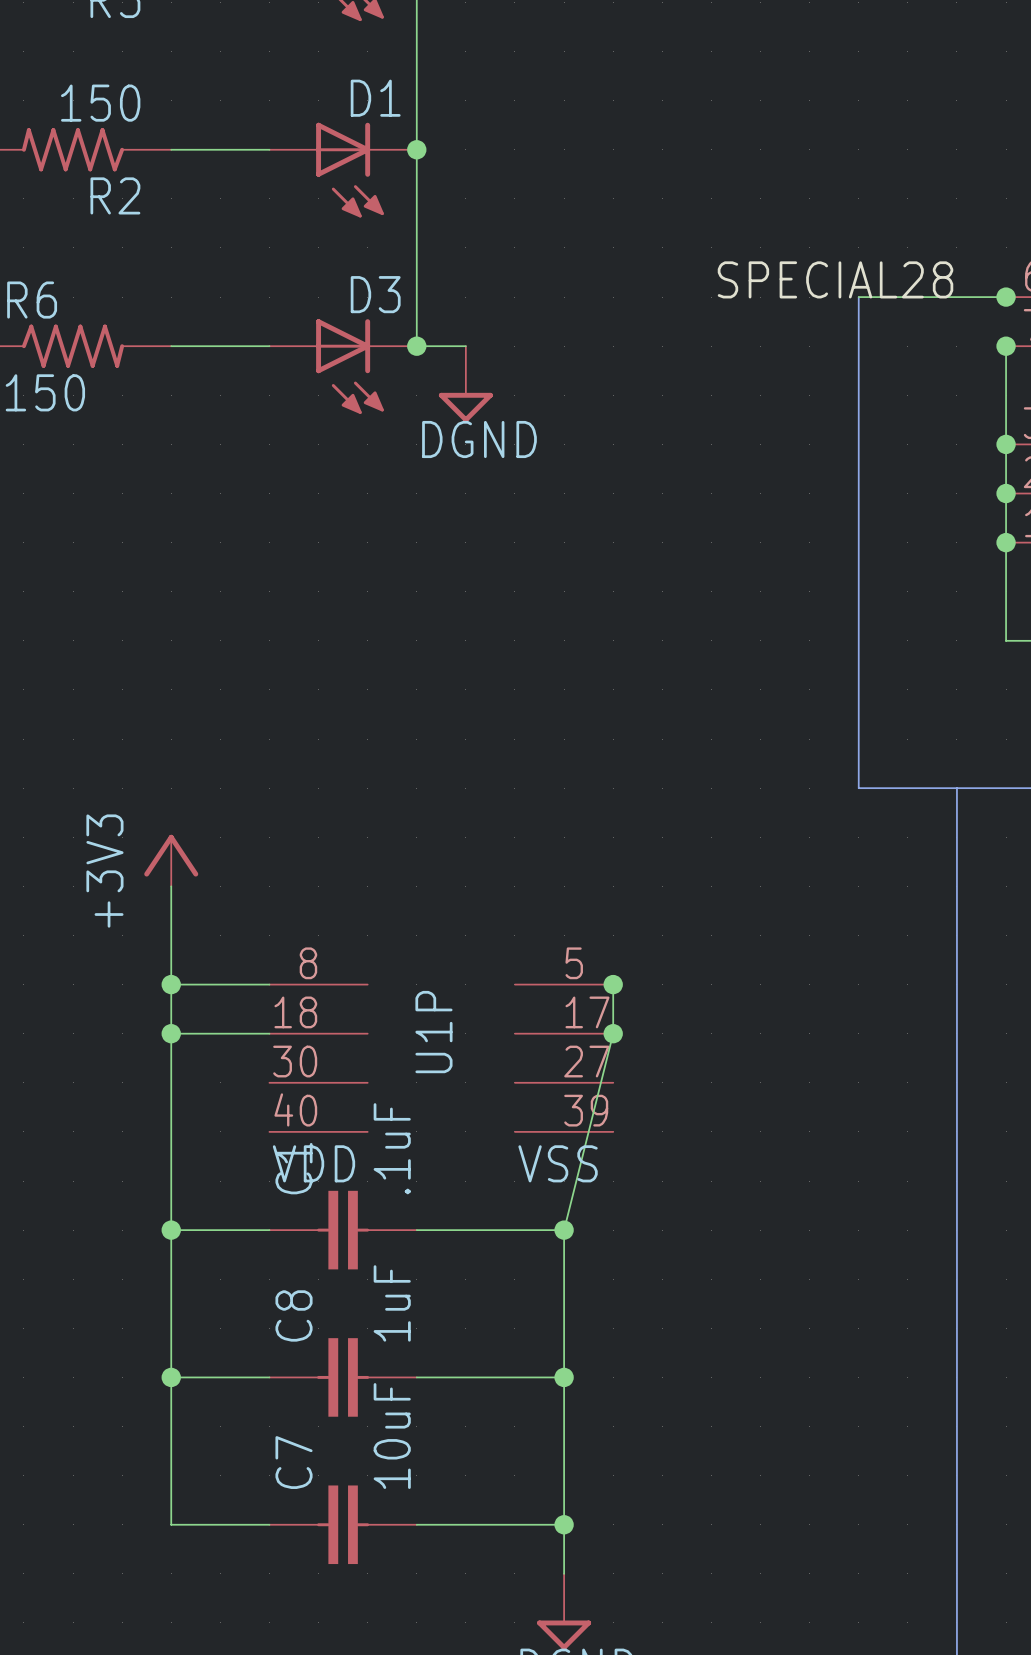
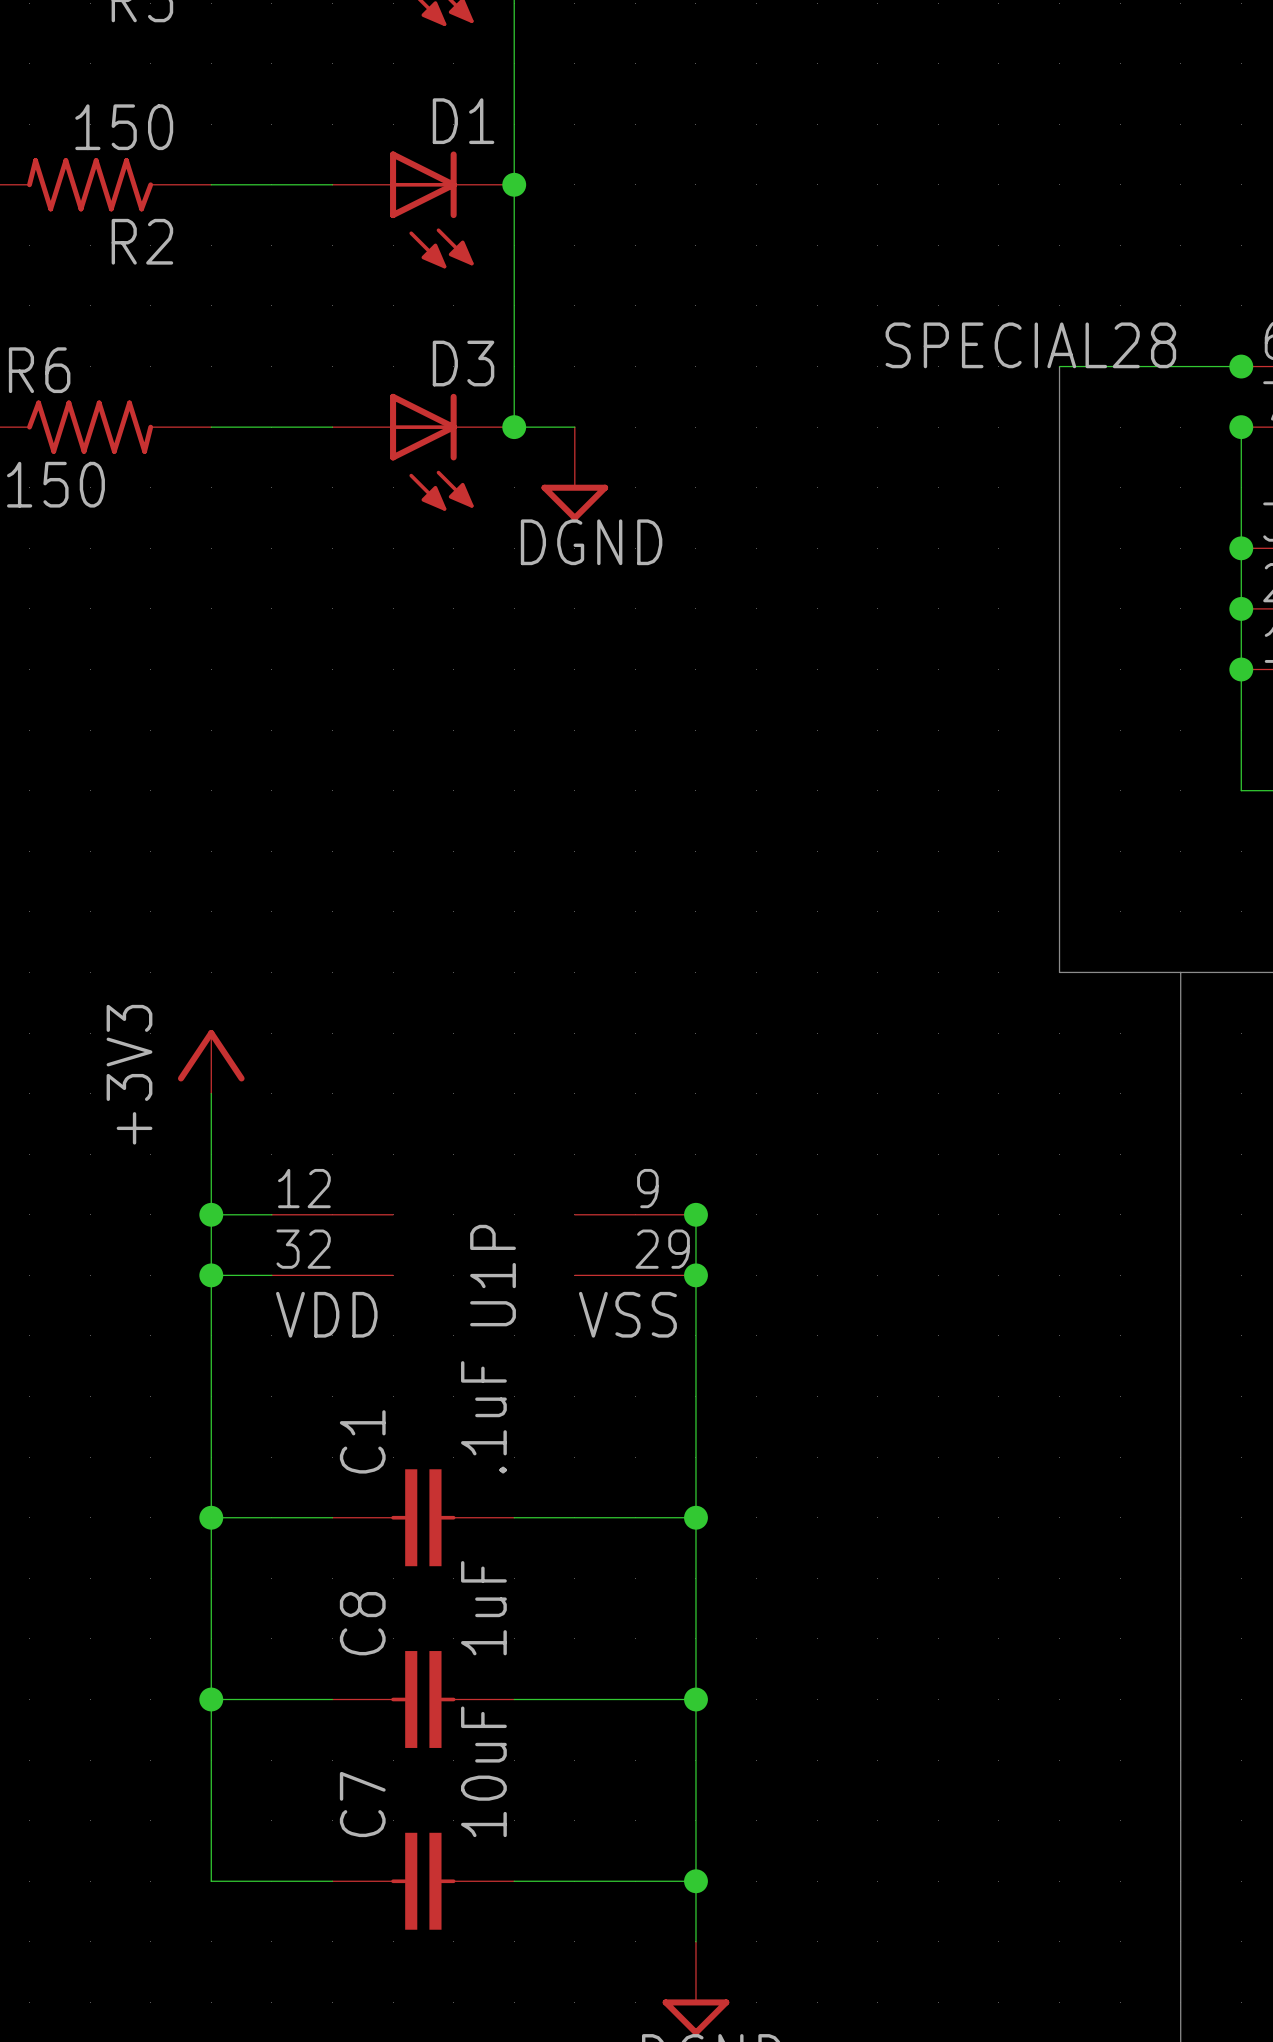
U1P symbol: [269, 984, 614, 1132] -> [271, 1214, 696, 1276]
junction: none -> (695, 1214)
wire: (613, 984) (613, 1033) (564, 1230) -> (695, 1214) (695, 1517)
junction: (613, 984) -> none
U1P name position: U1P (433, 1032) -> U1P (493, 1275)
junction: none -> (695, 1275)
junction: (613, 1033) -> none

